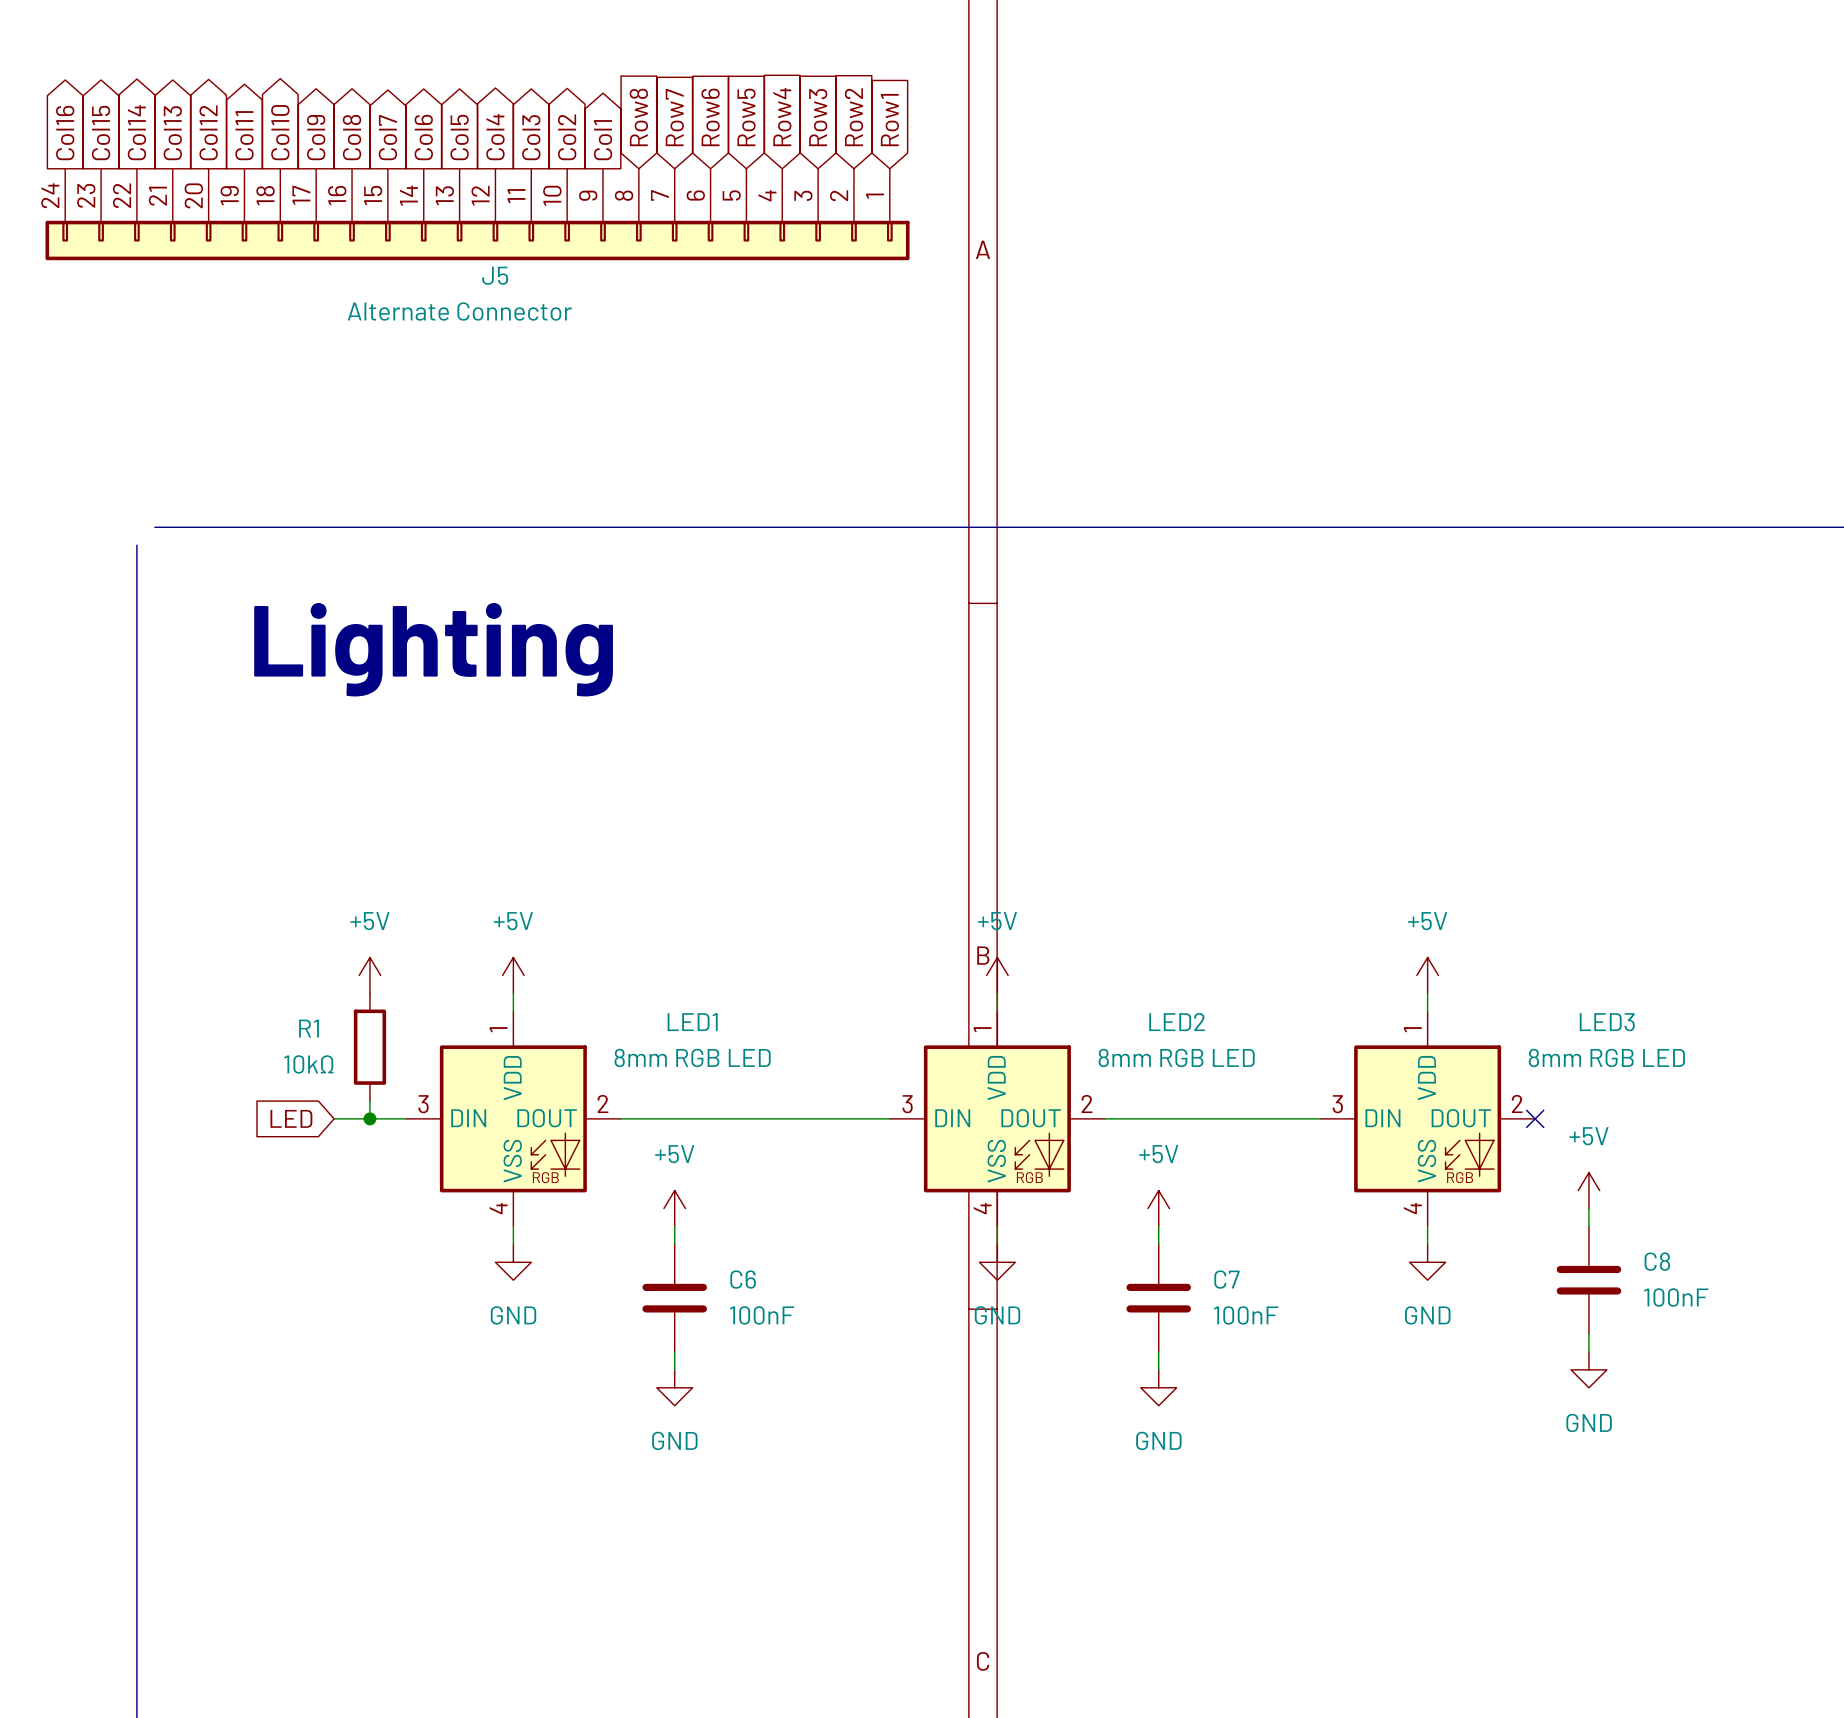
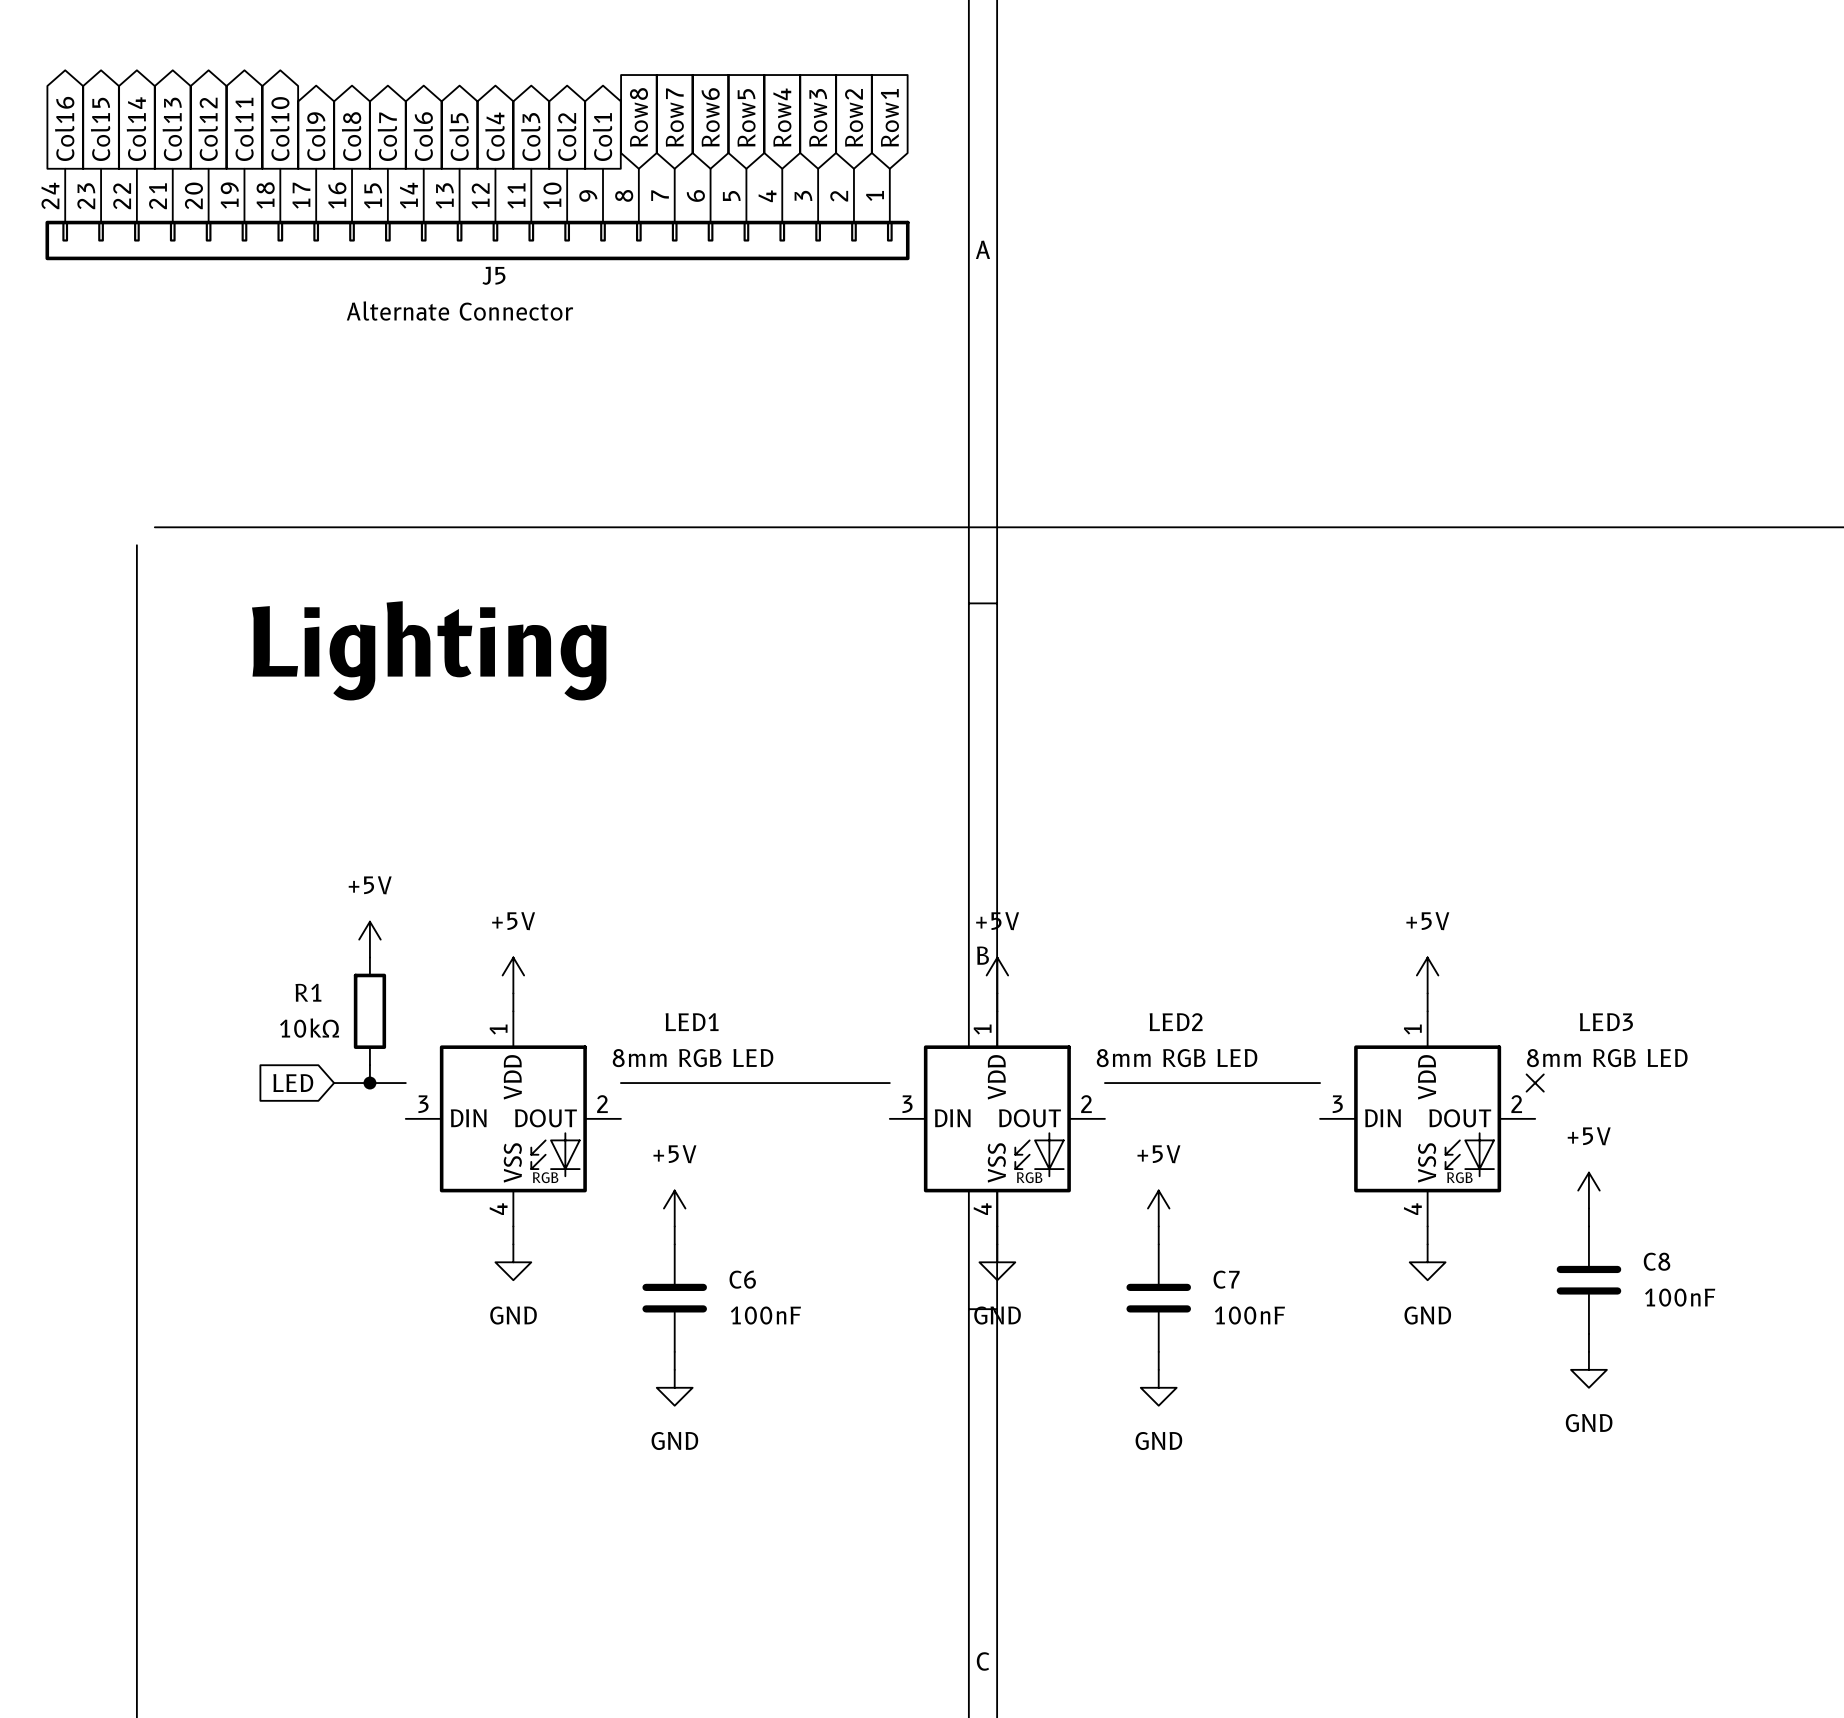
power symbol position: +5V (369, 975) -> +5V (369, 939)
R1 position: (369, 1047) -> (369, 1011)
wire: (369, 1100) (369, 1118) -> (369, 1065) (369, 1083)
global label position: LED (291, 1118) -> LED (293, 1083)
wire: (334, 1118) (405, 1118) -> (334, 1083) (405, 1083)
junction position: (369, 1118) -> (369, 1083)
wire: (620, 1118) (889, 1118) -> (620, 1083) (889, 1083)
wire: (1104, 1118) (1320, 1118) -> (1104, 1083) (1320, 1083)
no-connect mark position: (1535, 1118) -> (1535, 1083)

